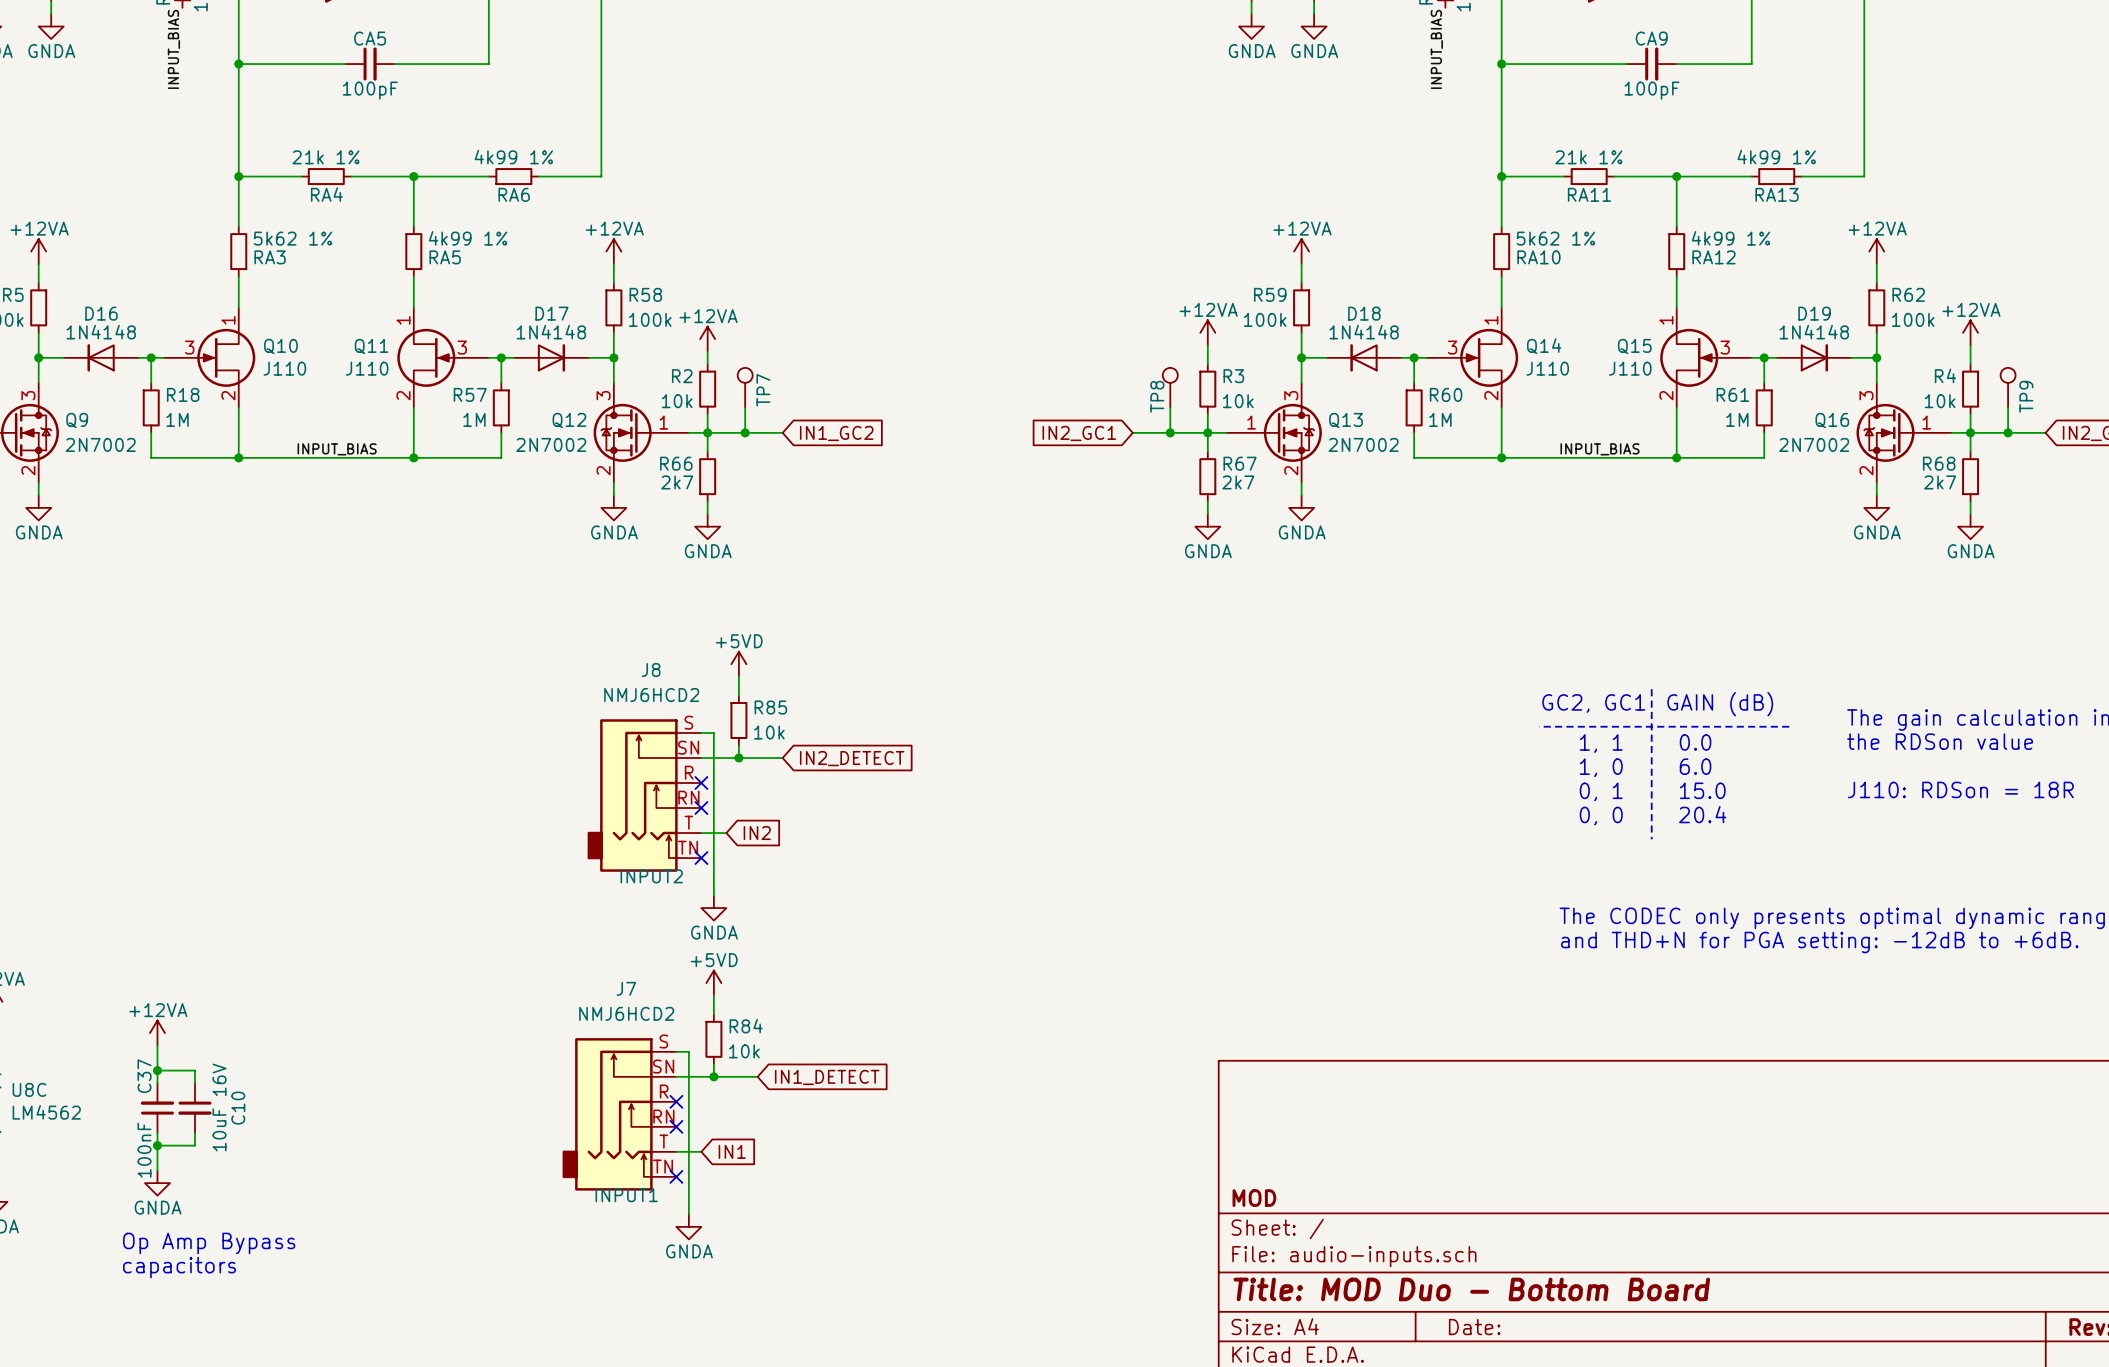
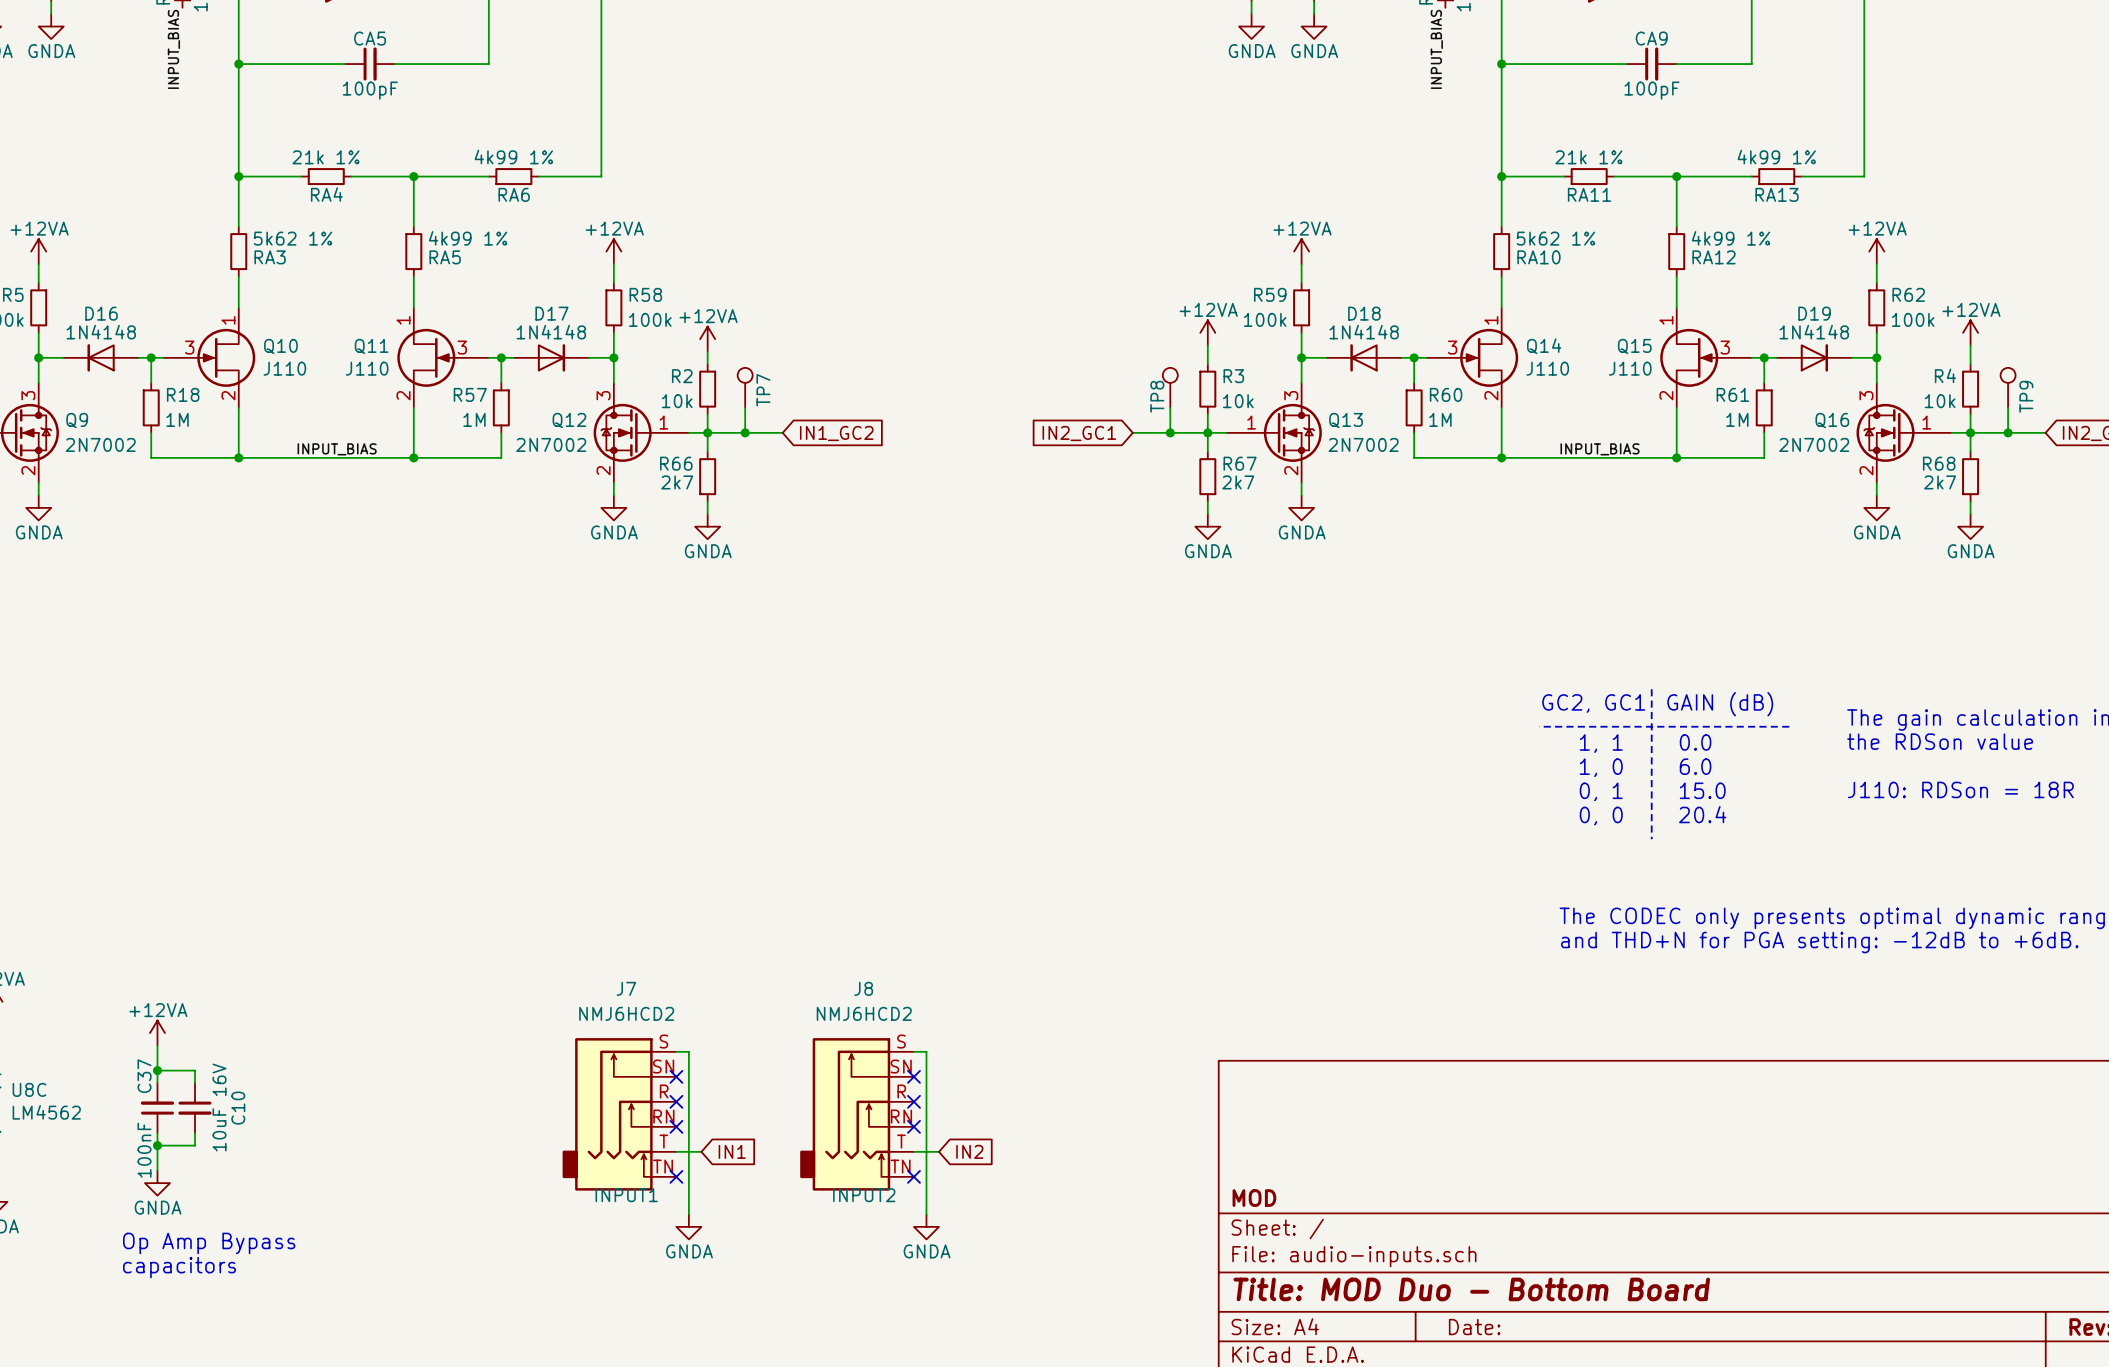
power symbol: +5VD (738, 664) -> none
wire: (738, 676) (738, 695) -> none
R85: 10k (738, 720) -> none
wire: (701, 732) (713, 732) (713, 895) -> none
wire: (738, 745) (738, 758) -> none
wire: (701, 758) (782, 758) -> none
junction: (738, 758) -> none
global label: IN2_DETECT (852, 758) -> none
no-connect mark: (701, 783) -> none
J8 position: (644, 795) -> (857, 1114)
no-connect mark: (701, 808) -> none
wire: (701, 833) (726, 833) -> none
global label: IN2 (757, 833) -> none
no-connect mark: (701, 858) -> none
power symbol: GNDA (713, 908) -> none
power symbol: +5VD (713, 983) -> none
wire: (713, 995) (713, 1014) -> none
R84: 10k (713, 1039) -> none
wire: none -> (913, 1051) (926, 1051) (926, 1214)
wire: (713, 1064) (713, 1076) -> none
wire: (676, 1076) (757, 1076) -> none
no-connect mark: none -> (676, 1076)
junction: (713, 1076) -> none
no-connect mark: none -> (913, 1076)
global label: IN1_DETECT (827, 1077) -> none
no-connect mark: none -> (913, 1101)
no-connect mark: none -> (913, 1126)
wire: none -> (913, 1151) (938, 1151)
global label: none -> IN2 (969, 1151)
no-connect mark: none -> (913, 1176)
power symbol: none -> GNDA (926, 1226)

